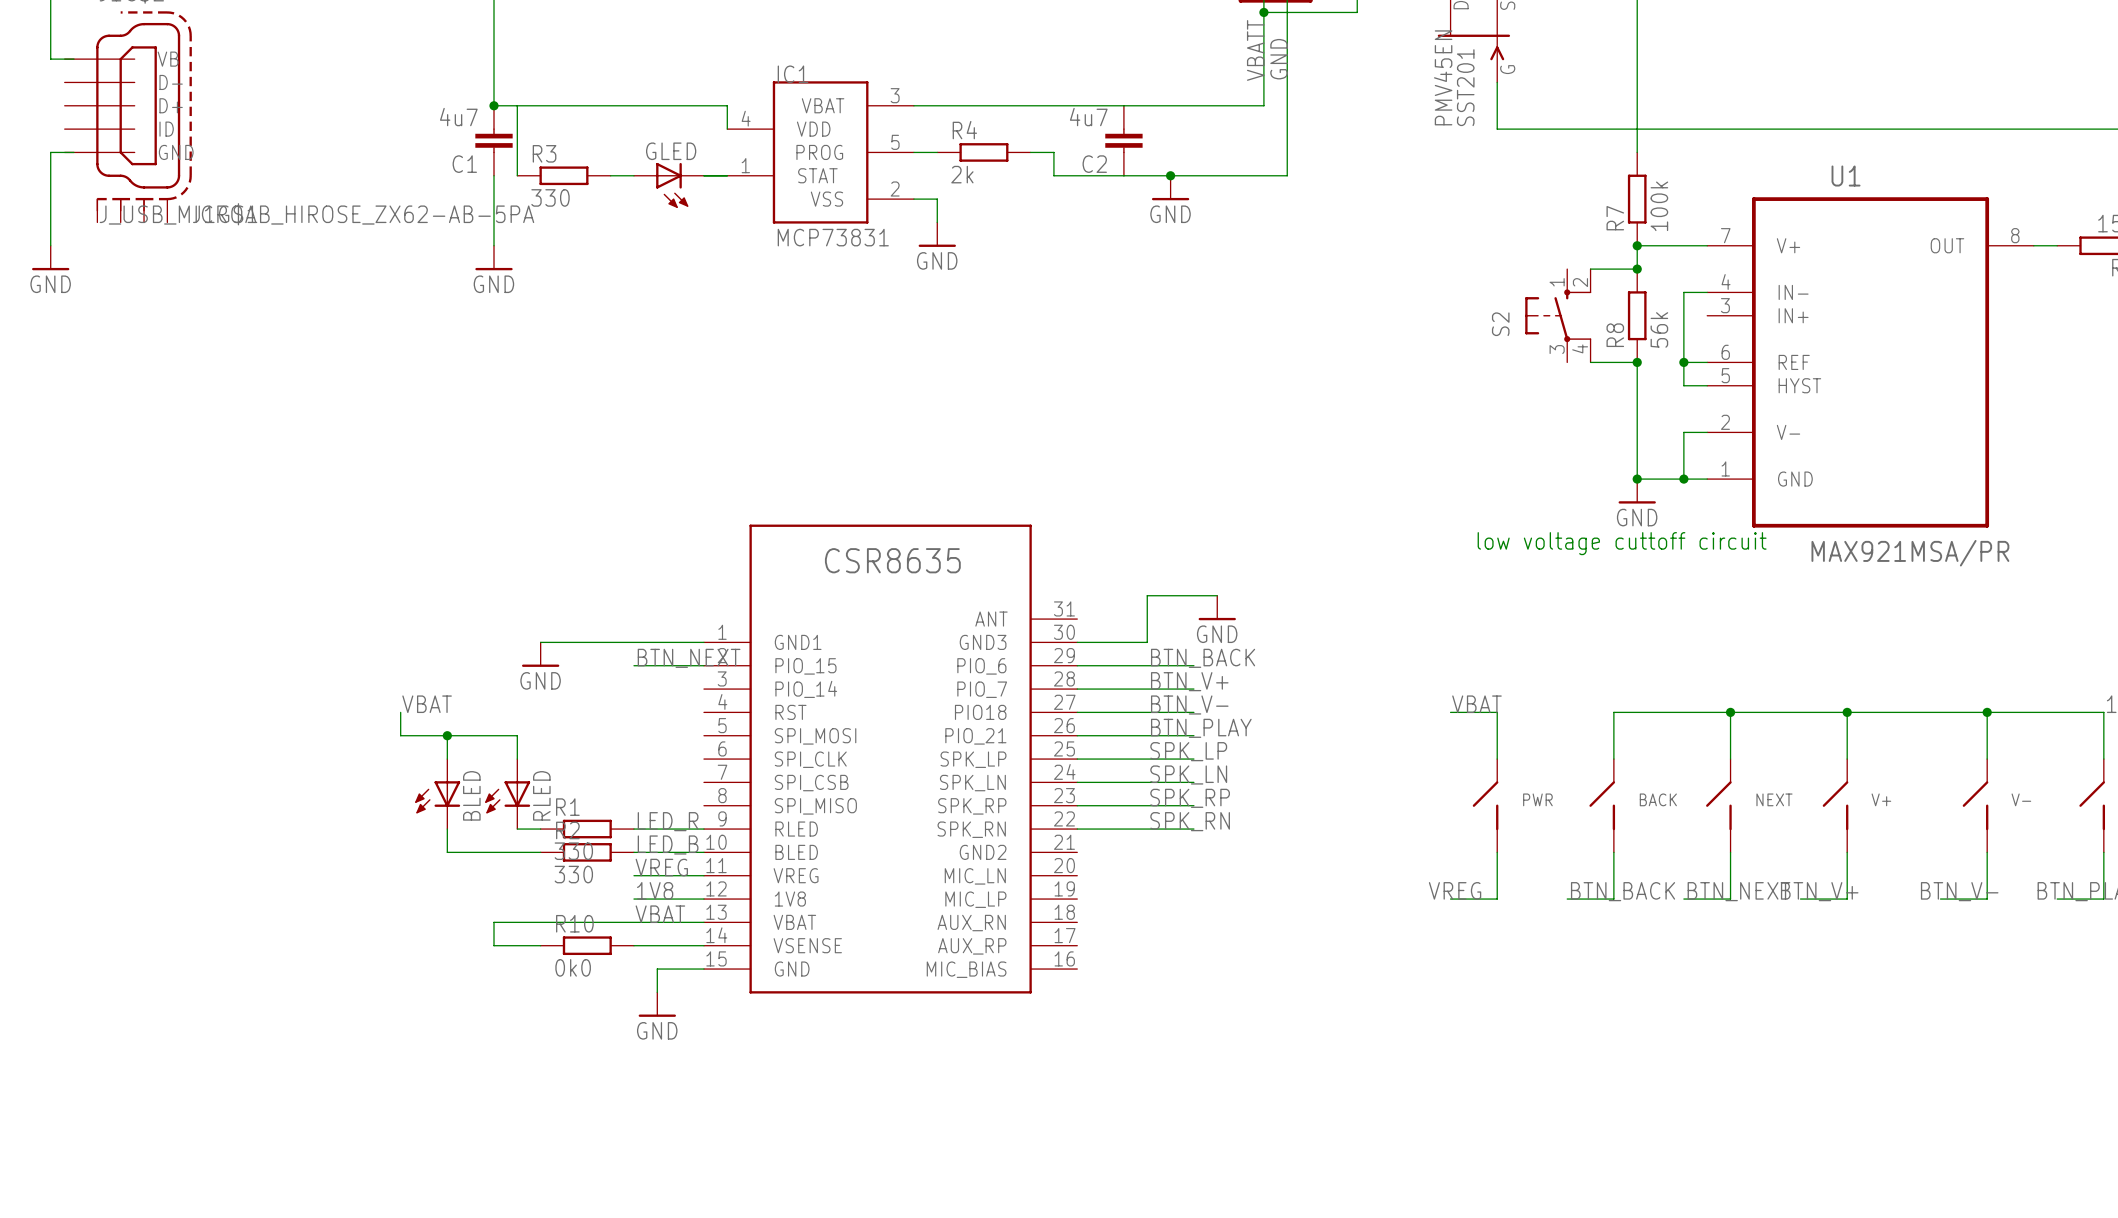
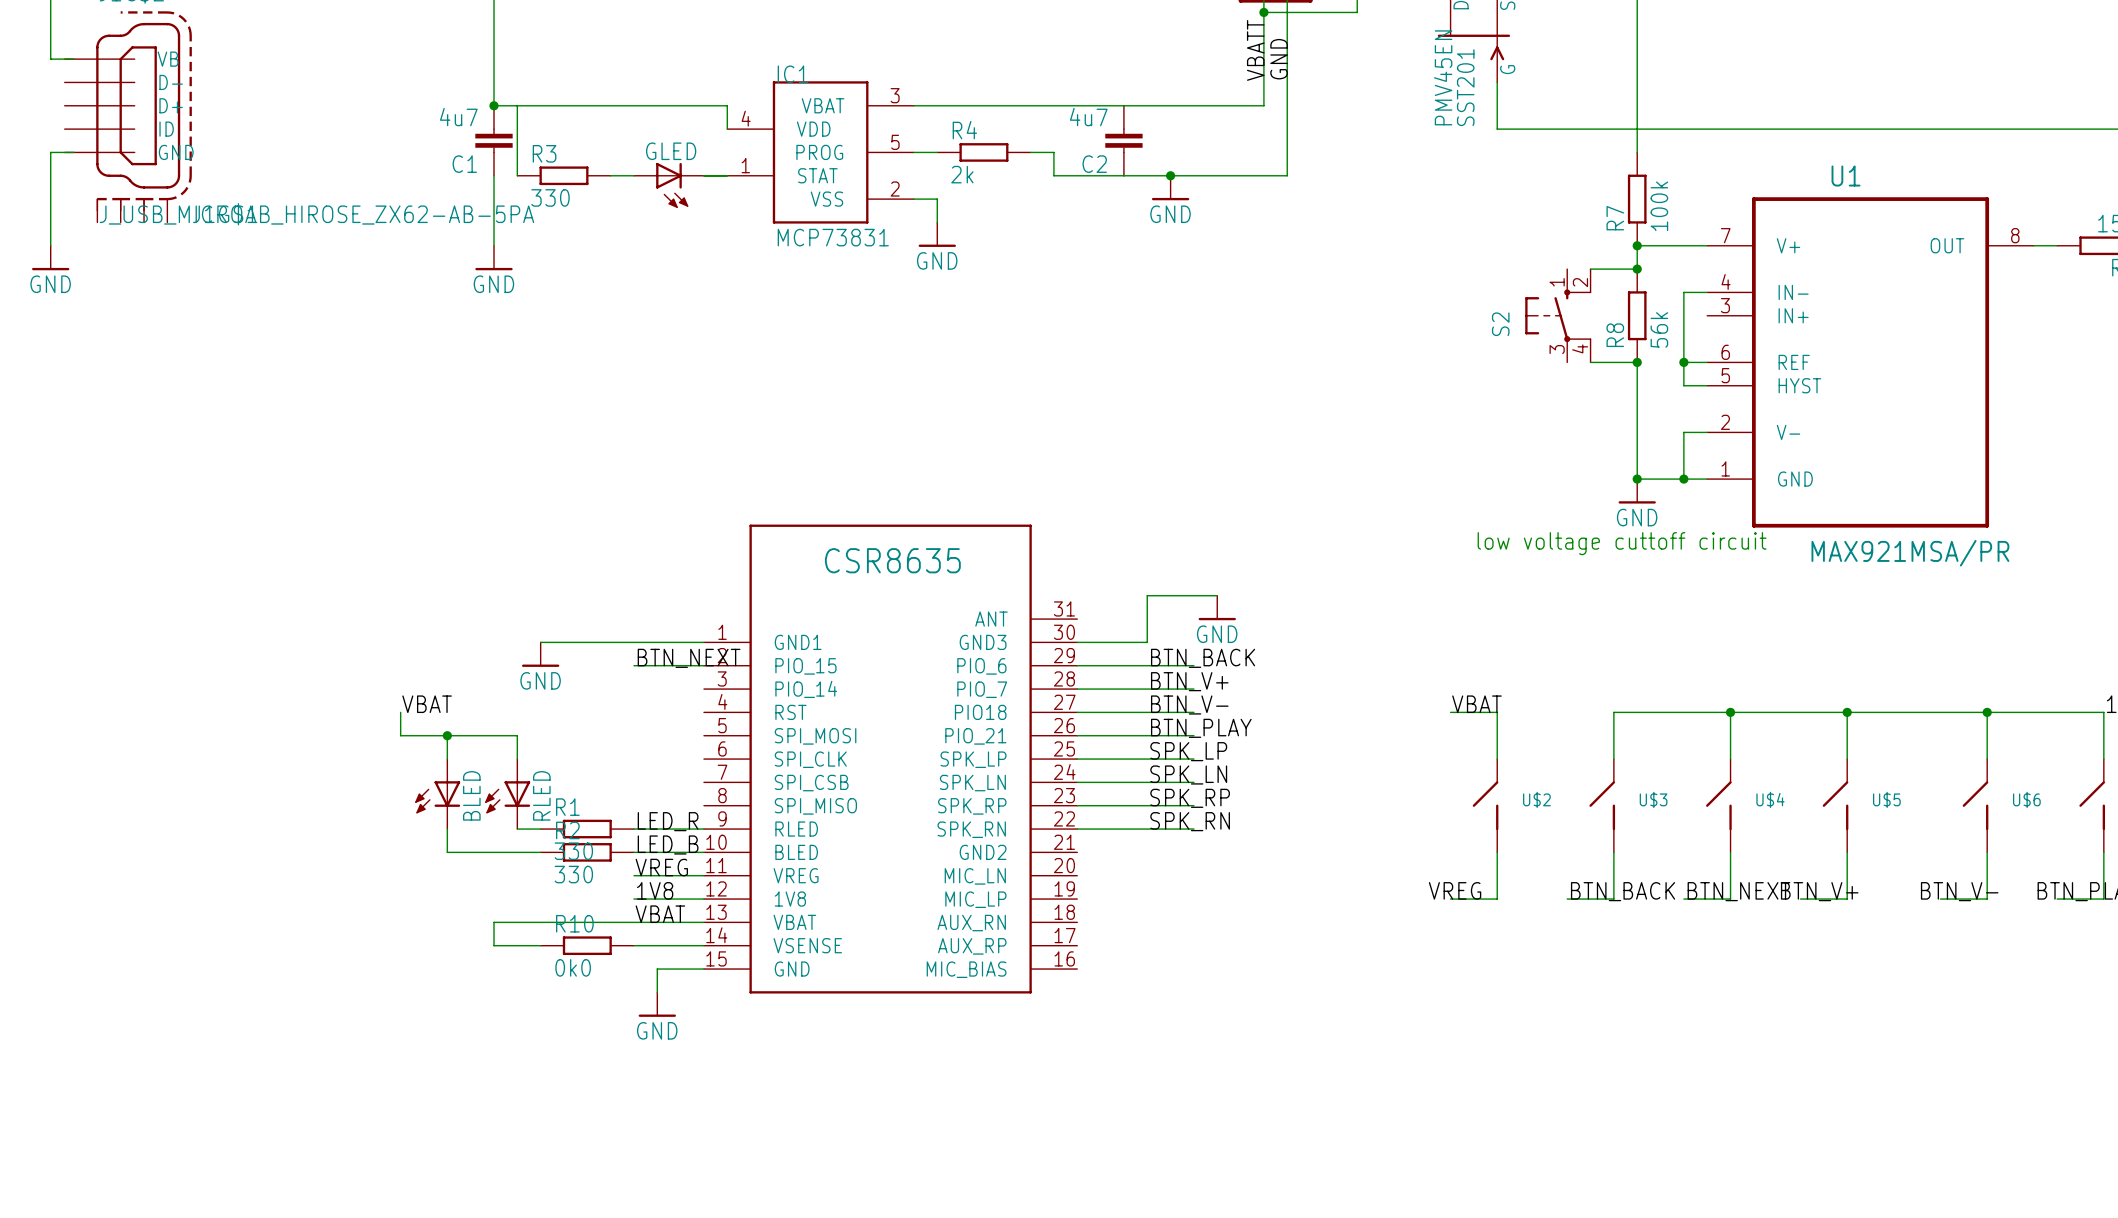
PWR name: PWR (1537, 799) -> U$2 (1536, 799)
BACK name: BACK (1658, 799) -> U$3 (1653, 799)
NEXT name: NEXT (1774, 799) -> U$4 (1770, 799)
V+ name: V+ (1881, 799) -> U$5 (1886, 799)
V- name: V- (2021, 799) -> U$6 (2026, 799)

